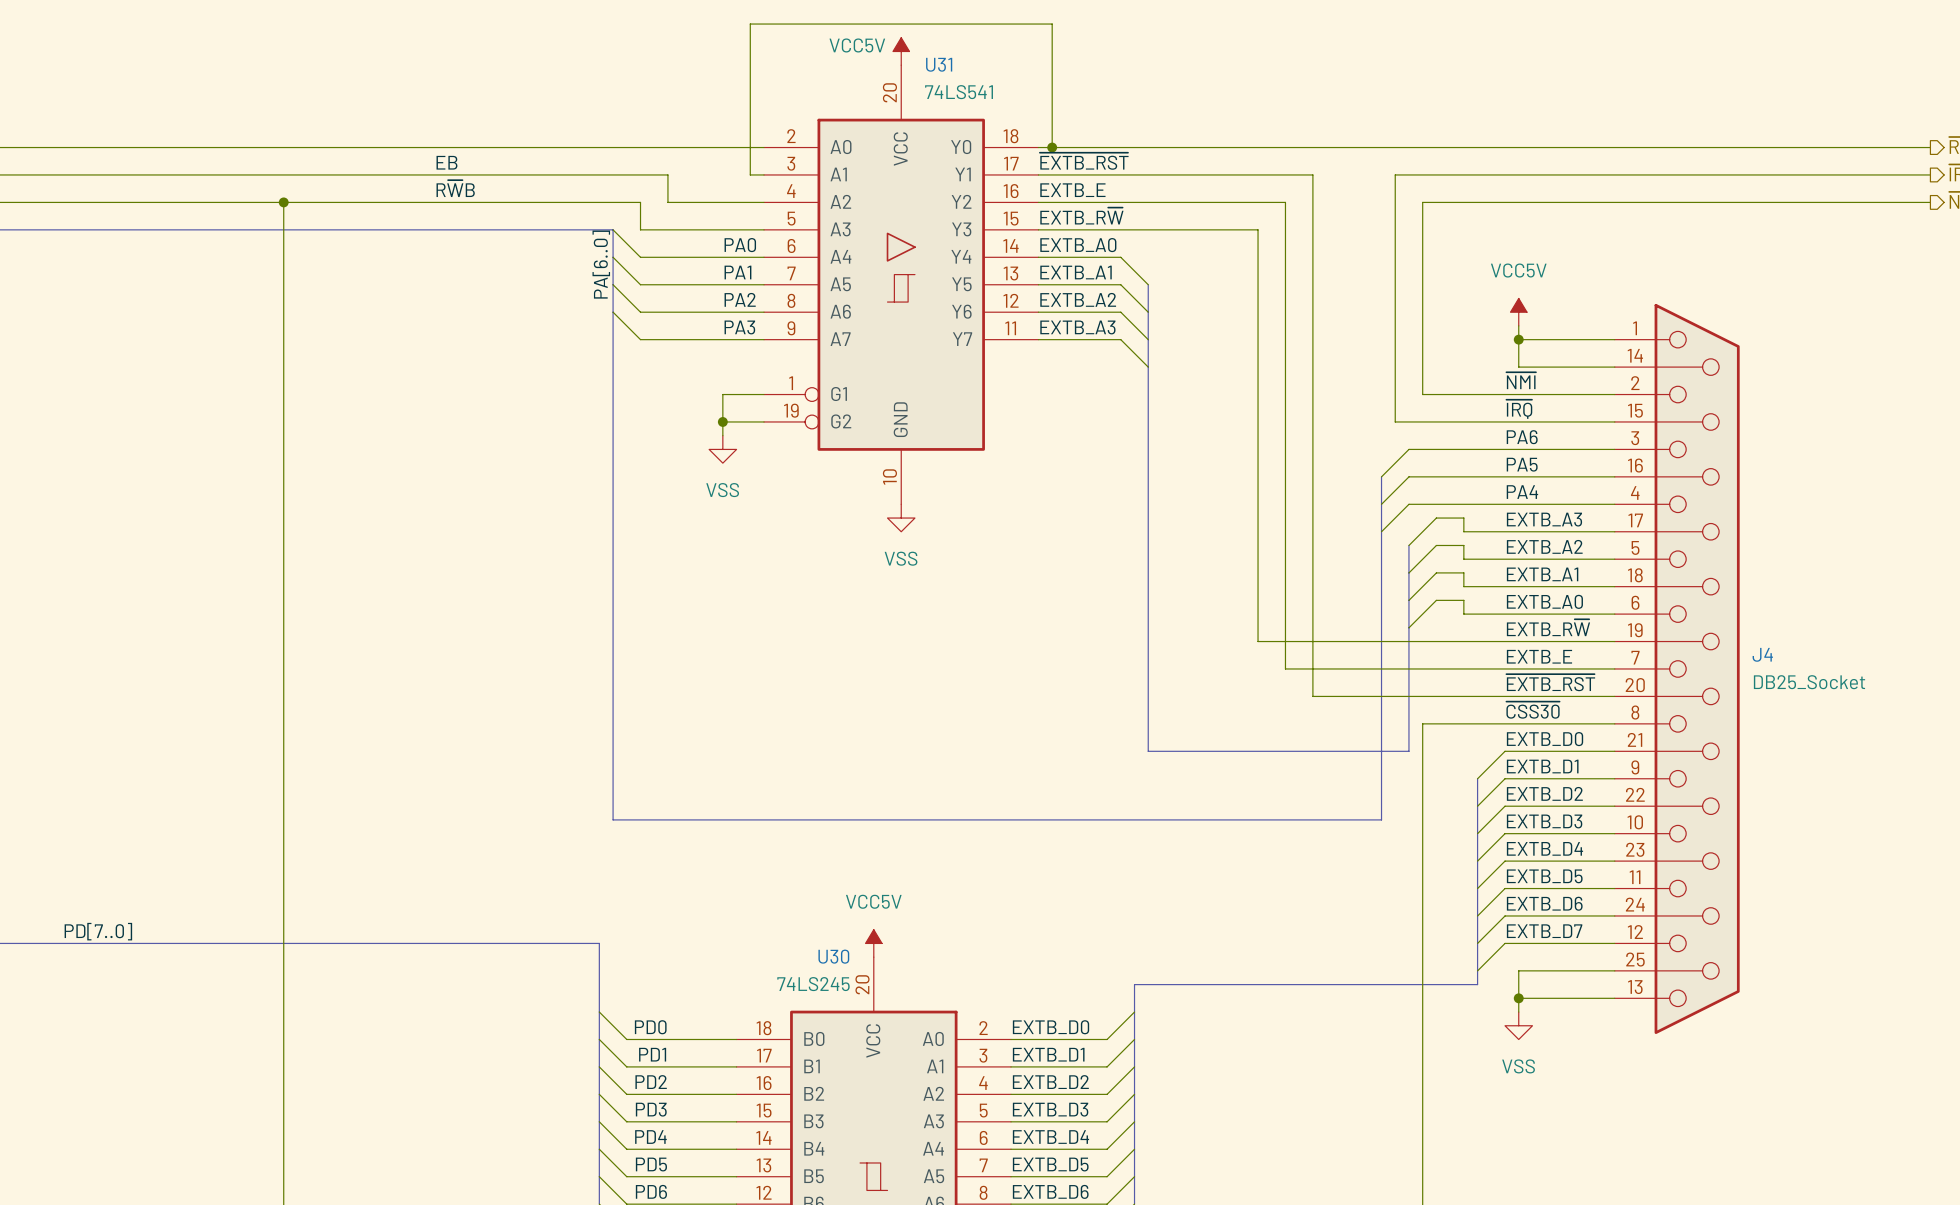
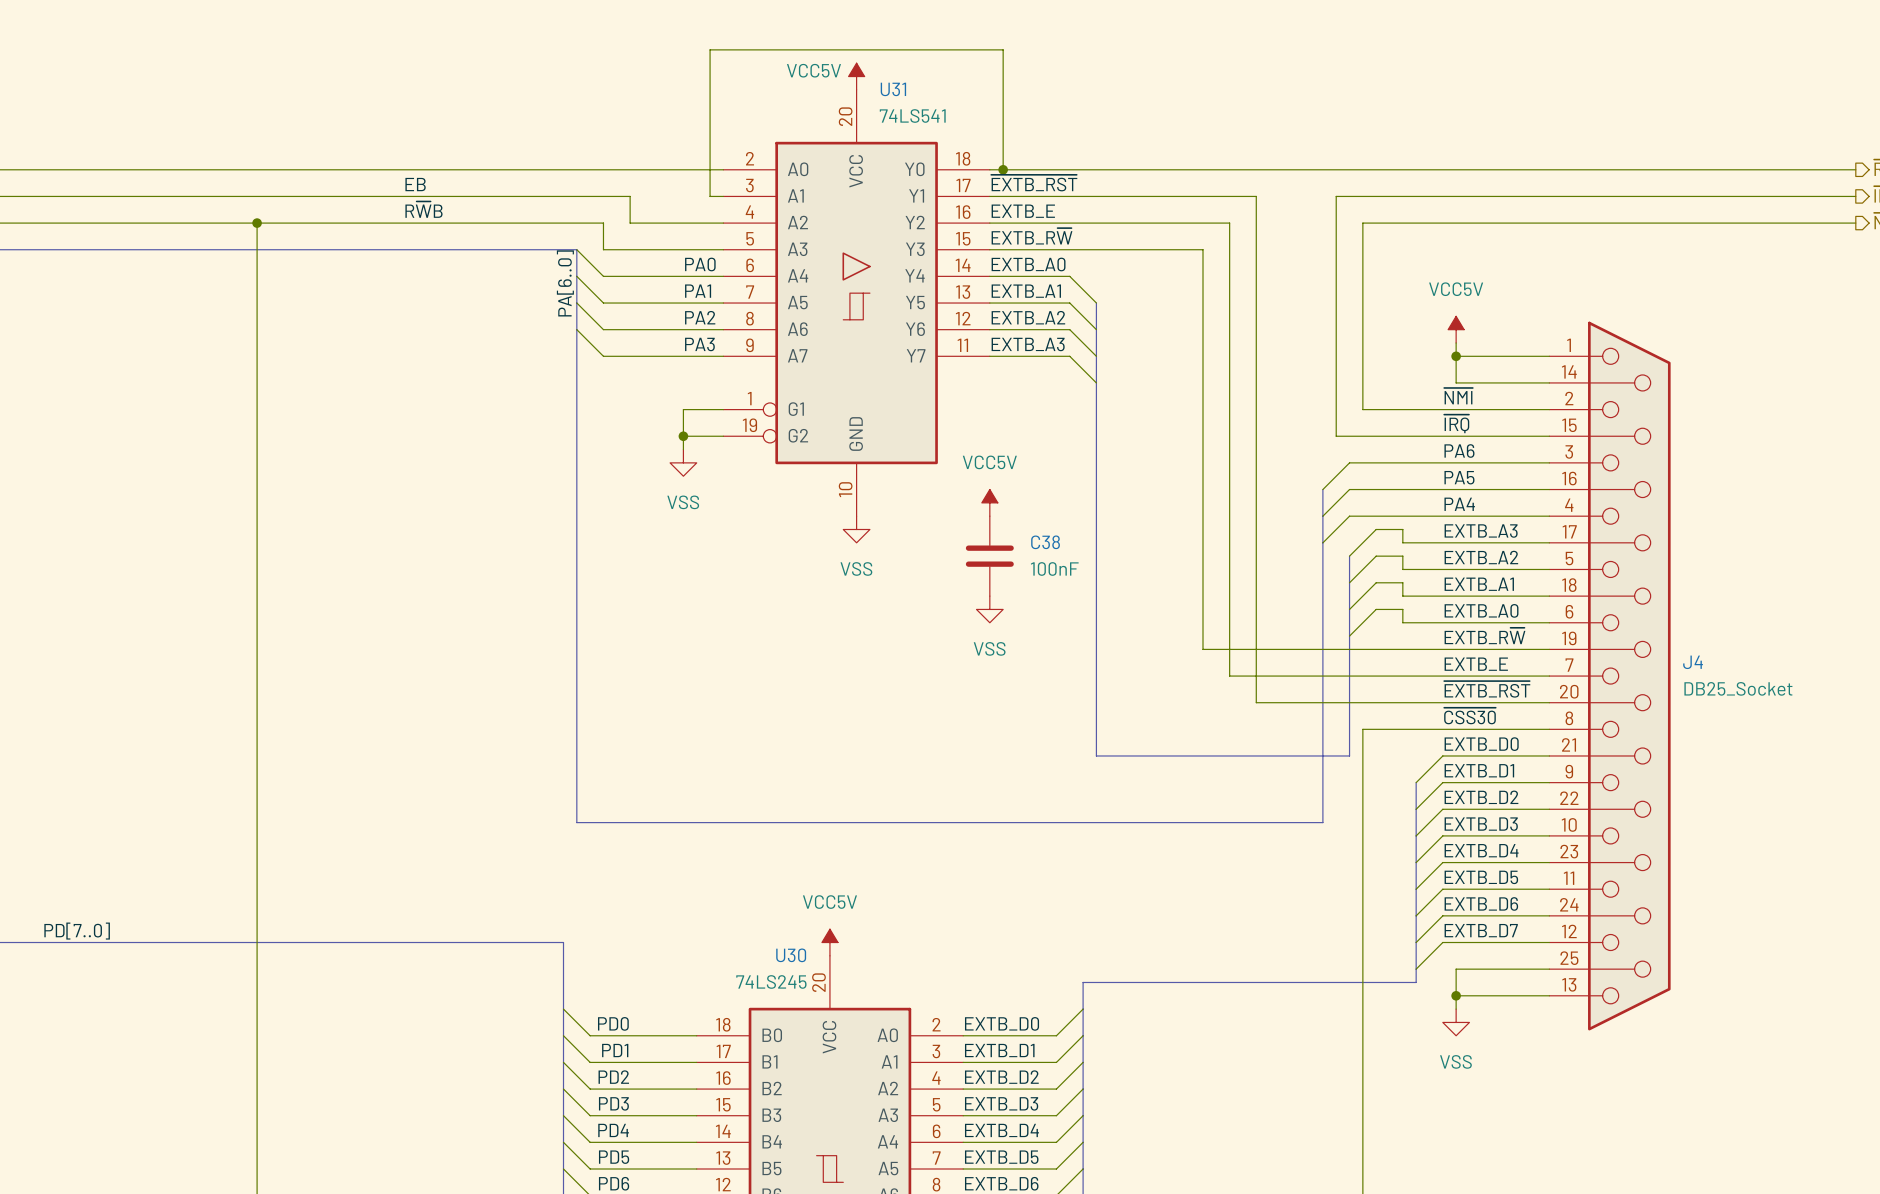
power symbol: none -> VCC5V (989, 502)
C38: none -> 100nF (989, 556)
power symbol: none -> VSS (989, 609)

